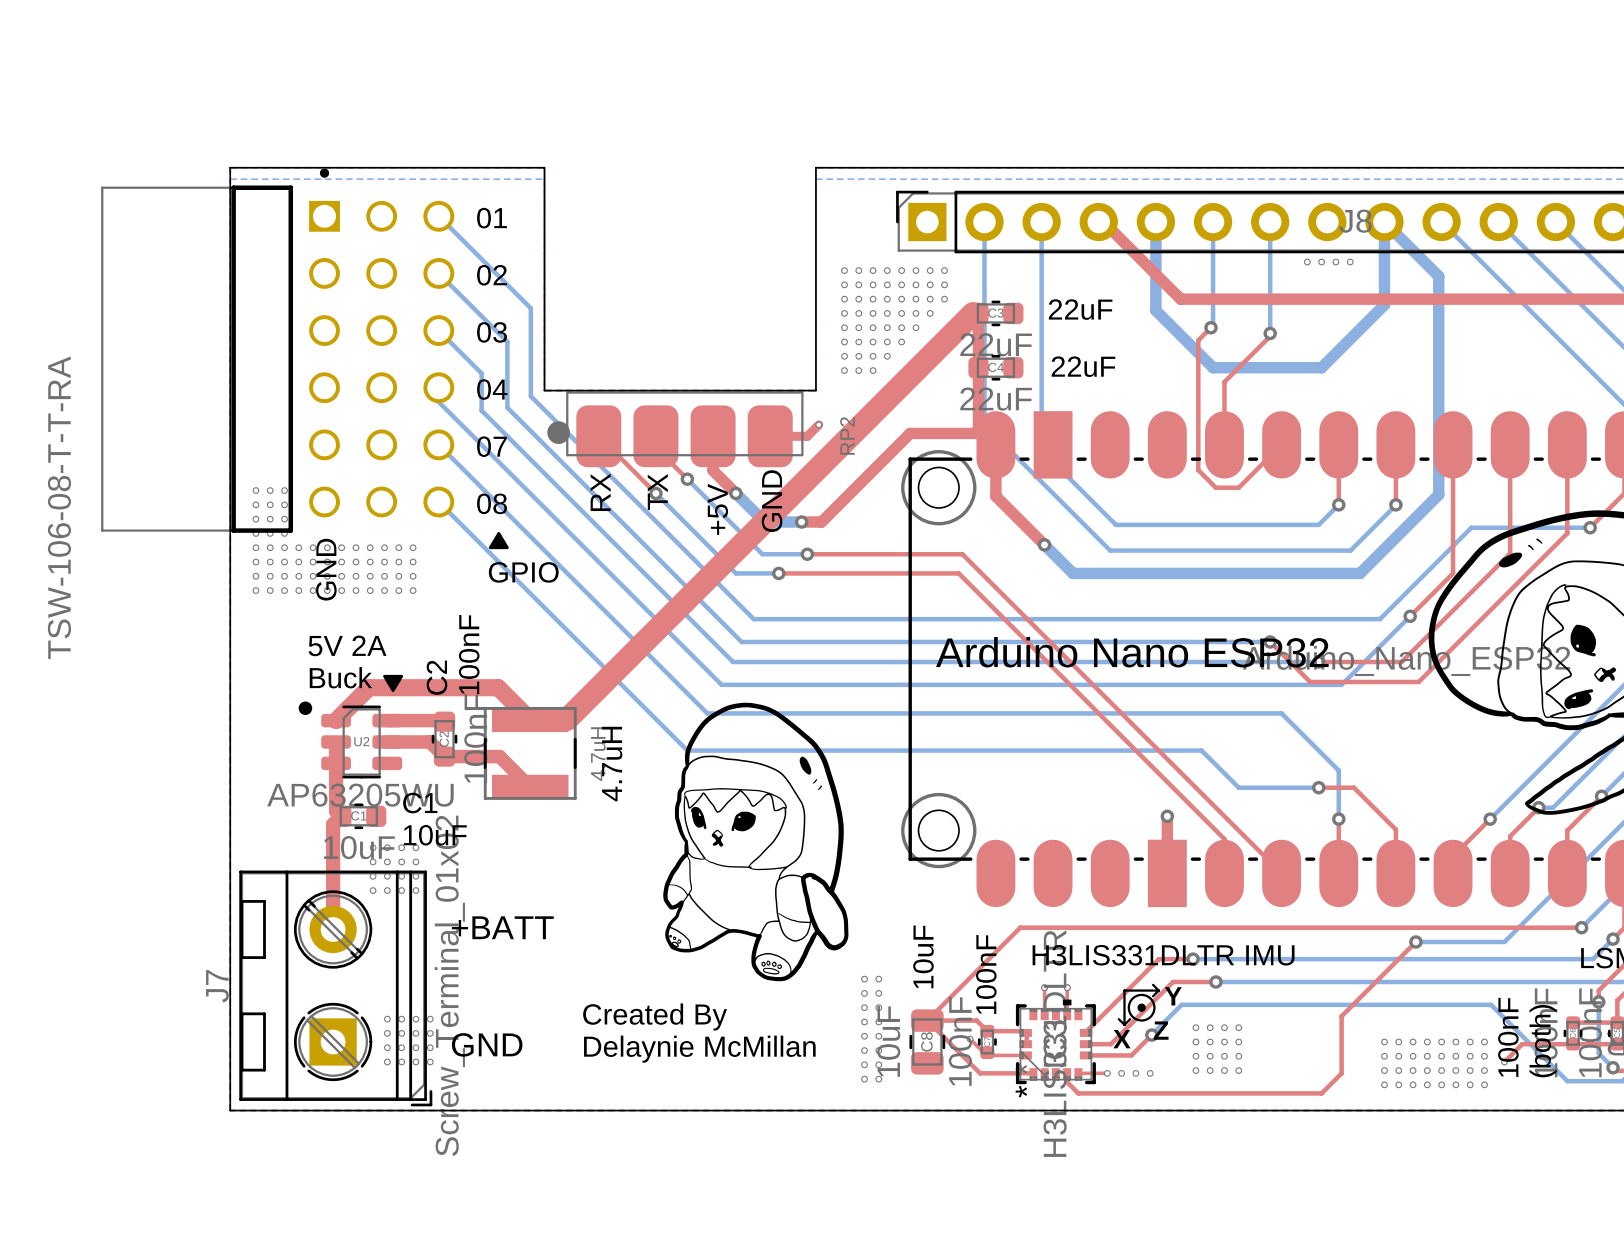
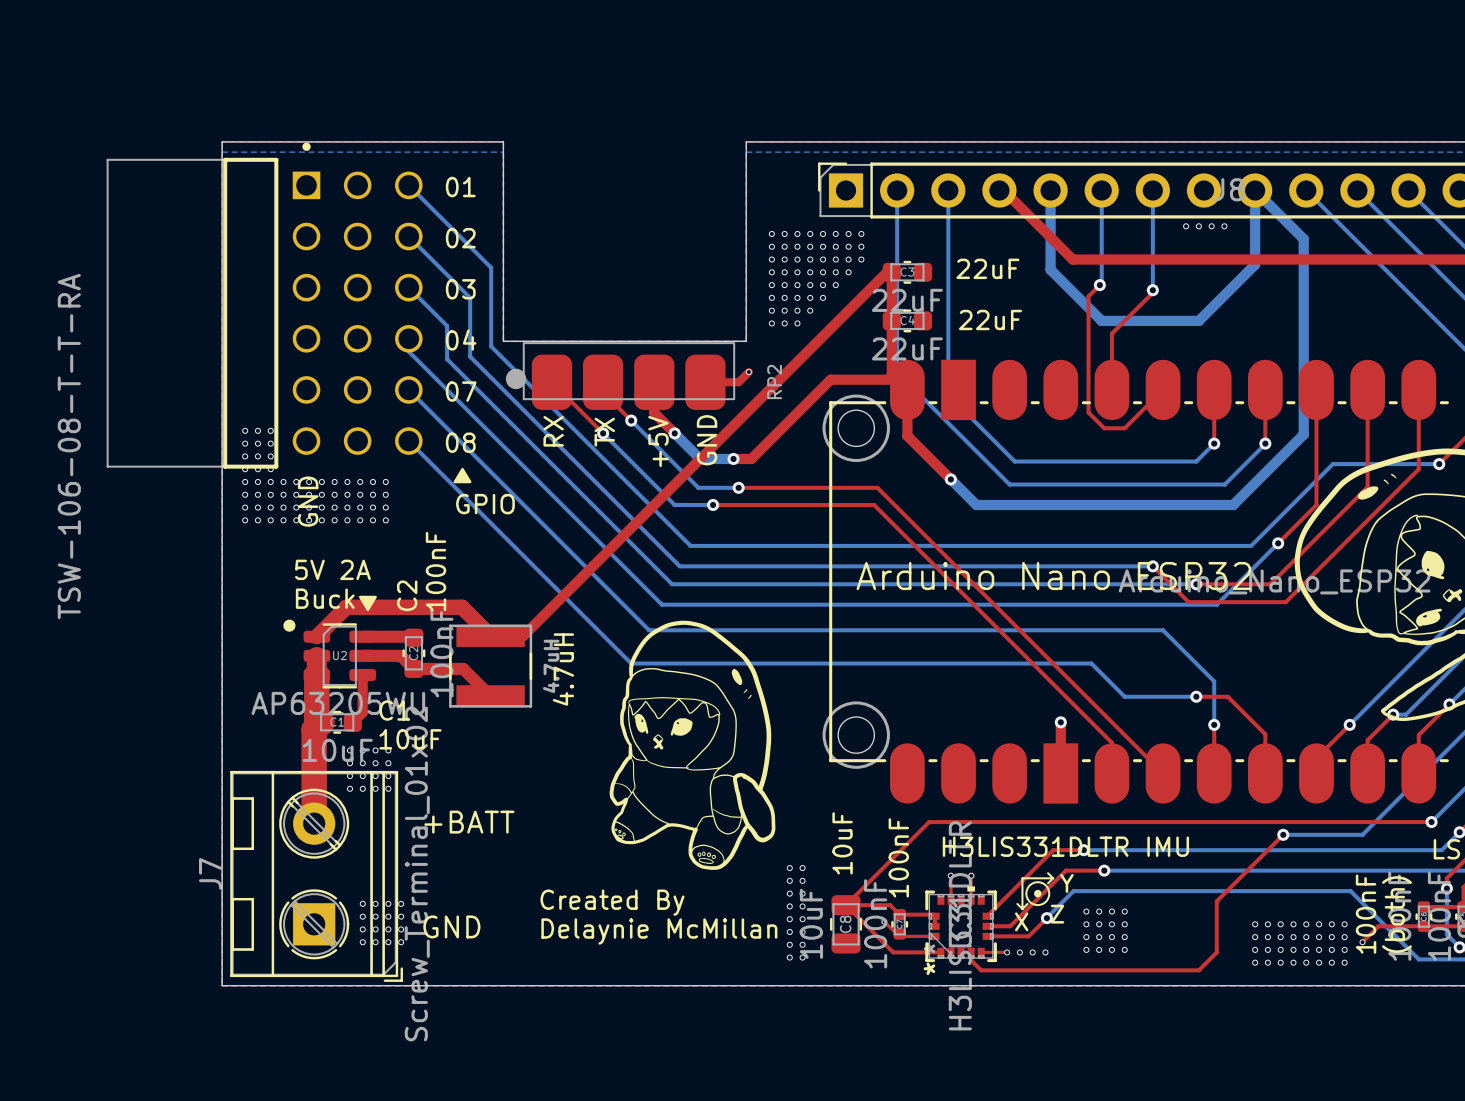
top track width: thick (973, 313) (566, 719) -> thin (886, 272) (523, 635)
top track width: thin (336, 743) (336, 810) (341, 816) (333, 824) (333, 929) -> thick (316, 657) (316, 717) (321, 722) (314, 729) (314, 823)
top track: none -> (362, 674) (362, 712) (352, 722)

